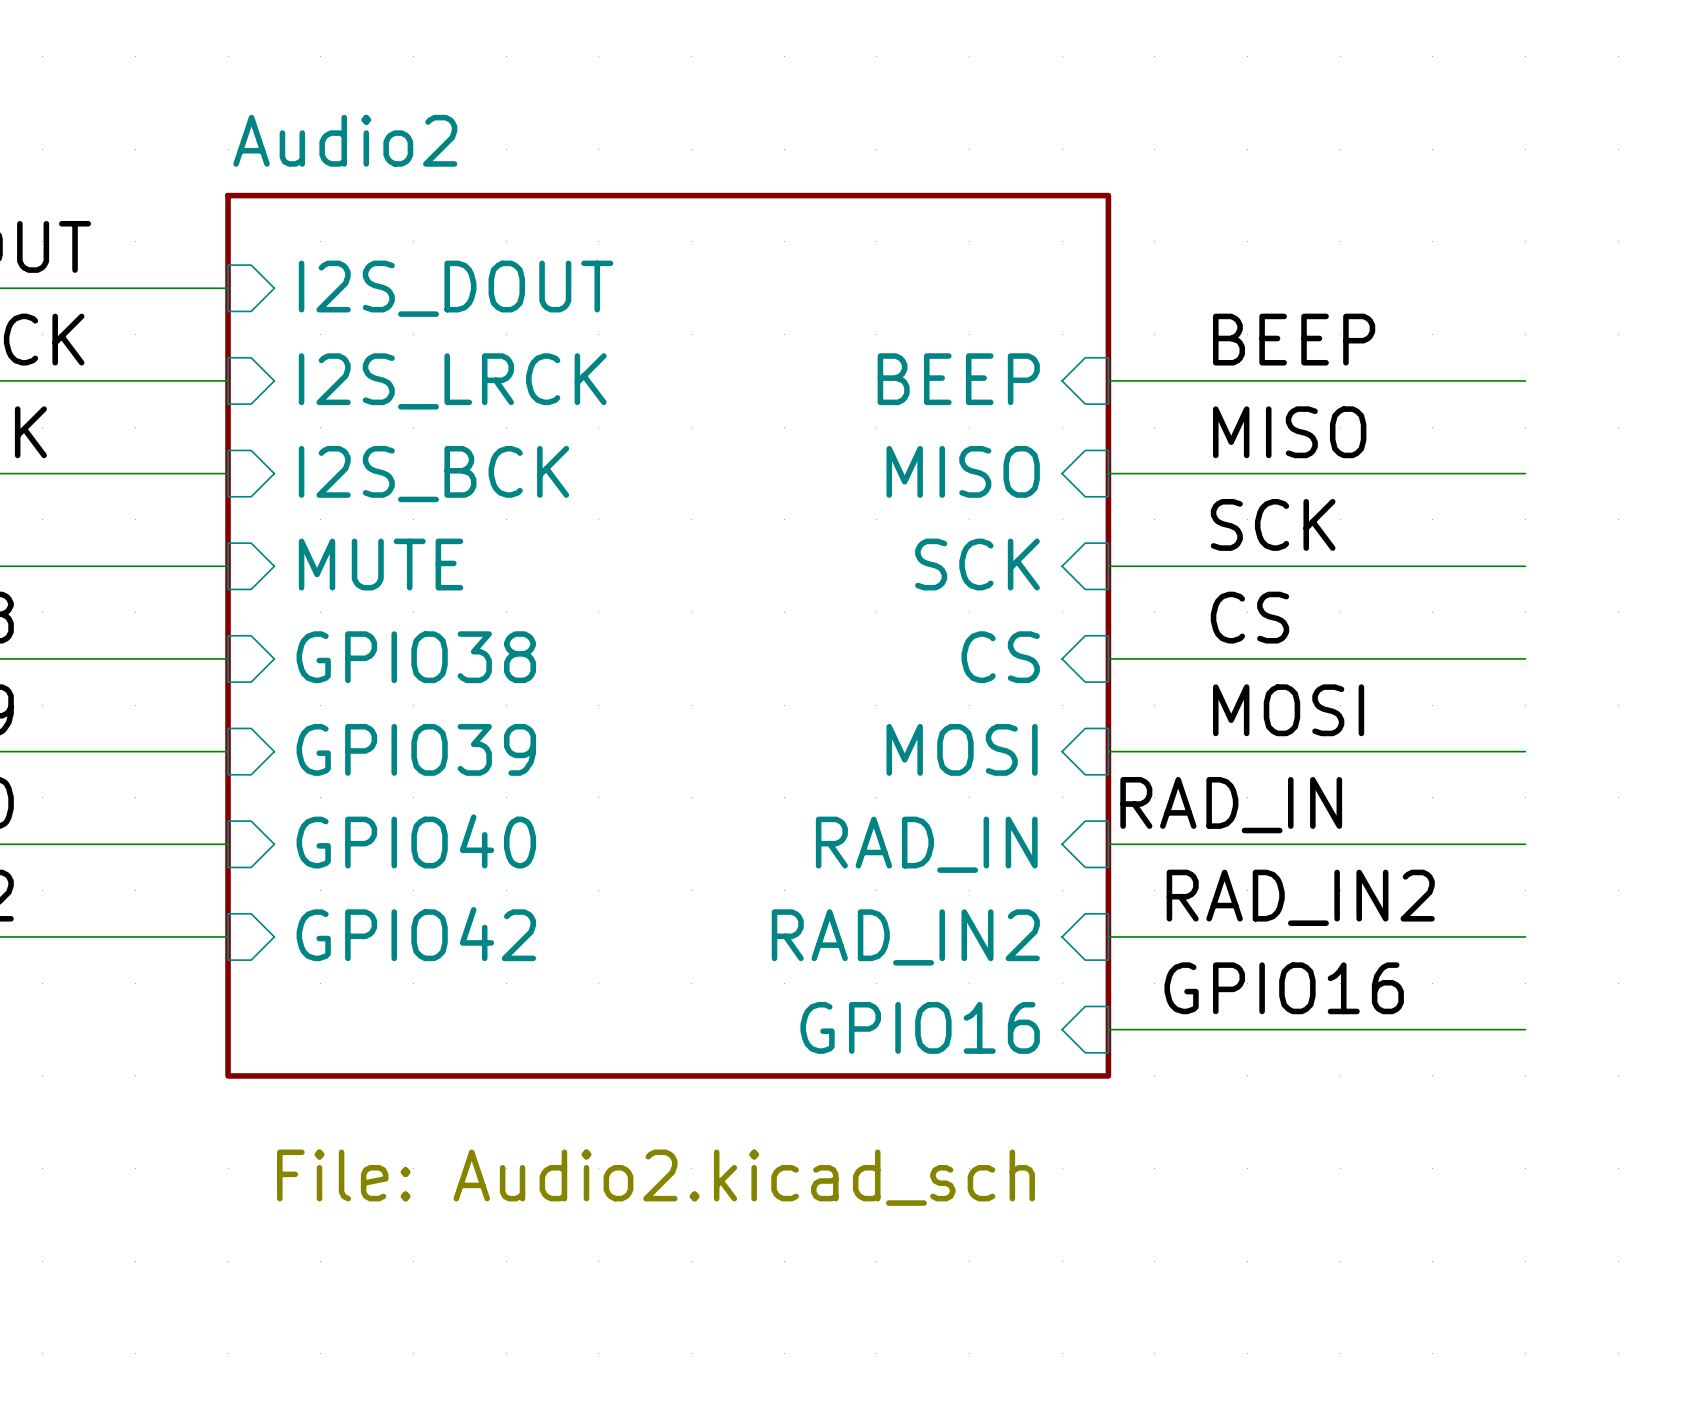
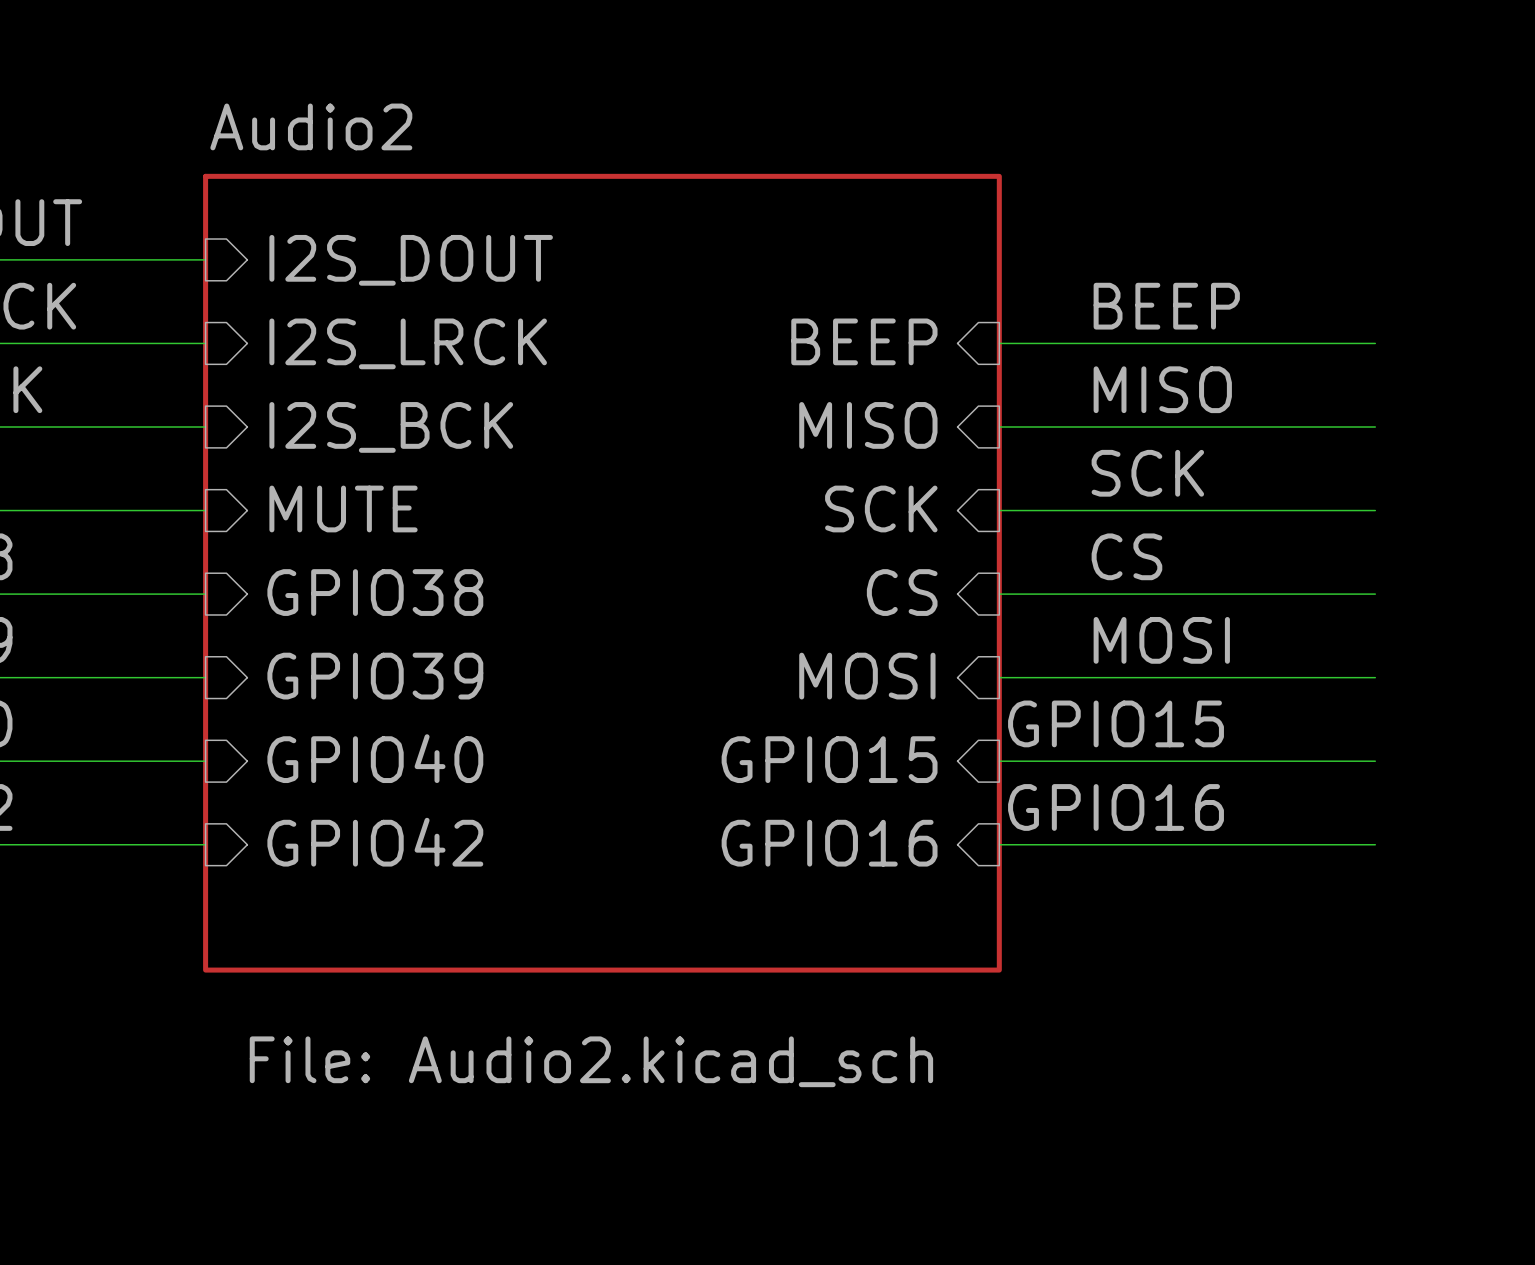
label: RAD_IN (1231, 805) -> GPIO15 (1116, 723)
sheet pin: RAD_IN (926, 844) -> GPIO15 (829, 759)
label: RAD_IN2 (1300, 897) -> none
sheet pin: RAD_IN2 (905, 937) -> GPIO16 (829, 843)
label position: GPIO16 (1284, 988) -> GPIO16 (1116, 807)
sheet pin: GPIO16 (920, 1027) -> none
wire: (1108, 1029) (1525, 1029) -> none

